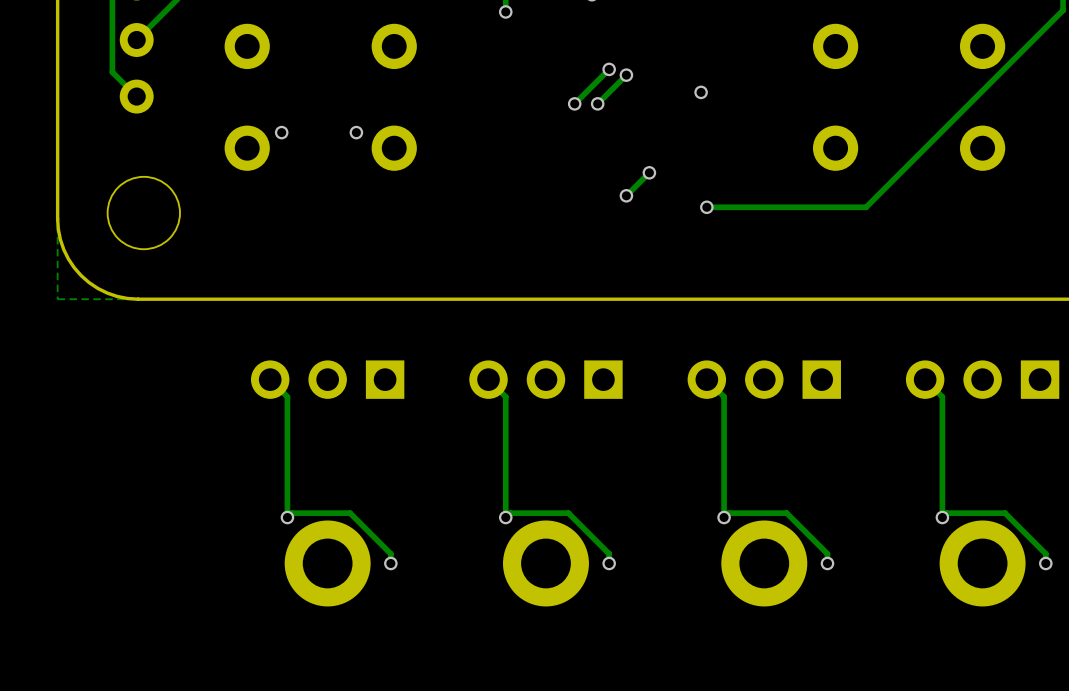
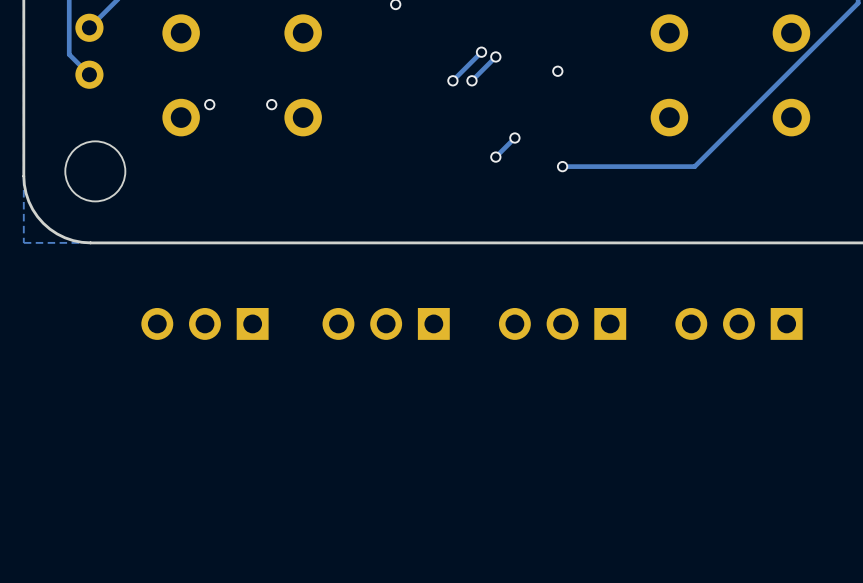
track: (270, 379) (287, 396) (287, 517) (291, 513) (350, 513) (390, 553) (390, 563) -> none
part position: (327, 379) -> (204, 323)
track: (488, 379) (505, 396) (505, 517) (510, 513) (568, 513) (609, 553) (609, 563) -> none
part position: (545, 379) -> (386, 323)
track: (706, 379) (724, 396) (724, 517) (728, 513) (786, 513) (827, 553) (827, 563) -> none
part position: (764, 379) -> (562, 323)
track: (925, 379) (942, 396) (942, 517) (946, 513) (1005, 513) (1045, 553) (1045, 563) -> none
part position: (982, 379) -> (738, 323)
via: (287, 517) -> none
via: (505, 517) -> none
via: (724, 517) -> none
via: (942, 517) -> none
part: (327, 563) -> none
via: (390, 563) -> none
part: (545, 563) -> none
via: (609, 563) -> none
part: (764, 563) -> none
via: (827, 563) -> none
part: (982, 563) -> none
via: (1045, 563) -> none

